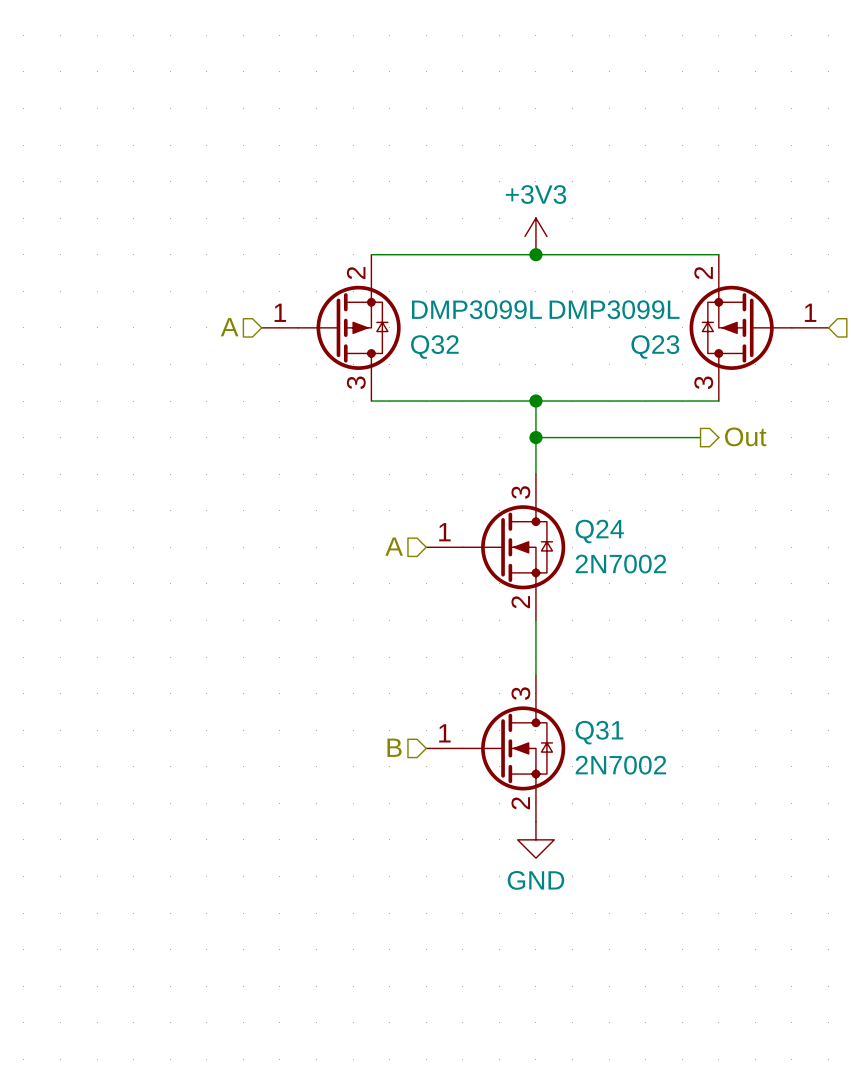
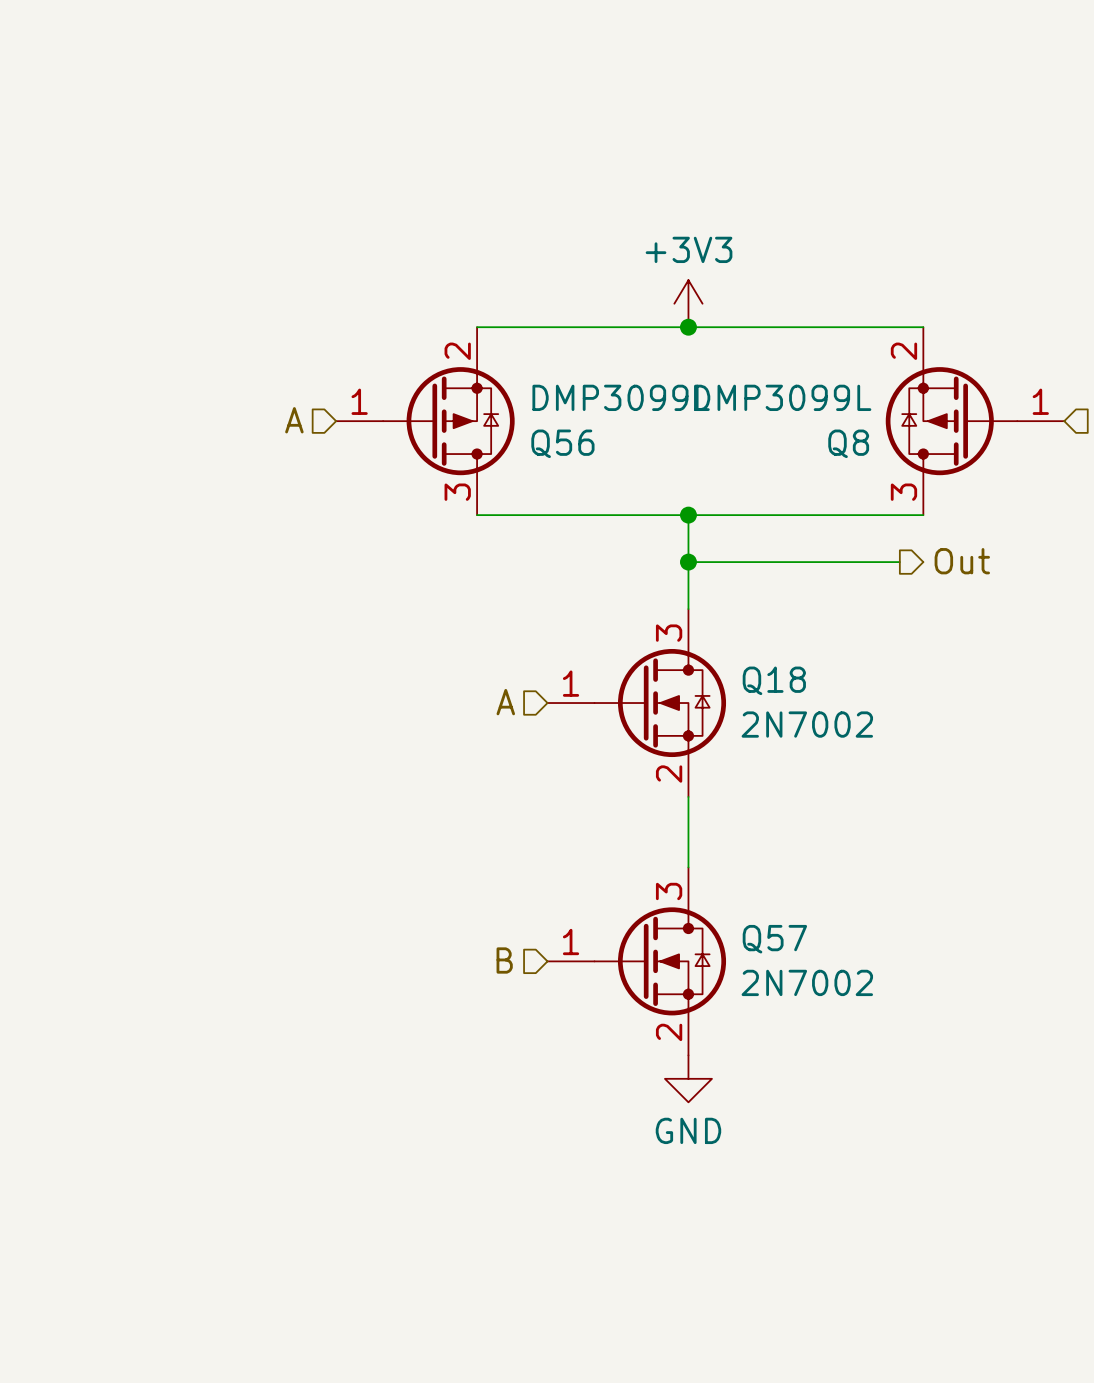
Q32 name: Q32 (434, 347) -> Q56 (562, 443)
Q23 name: Q23 (655, 347) -> Q8 (848, 443)
Q24 name: Q24 (599, 531) -> Q18 (774, 680)
Q31 name: Q31 (599, 732) -> Q57 (774, 939)

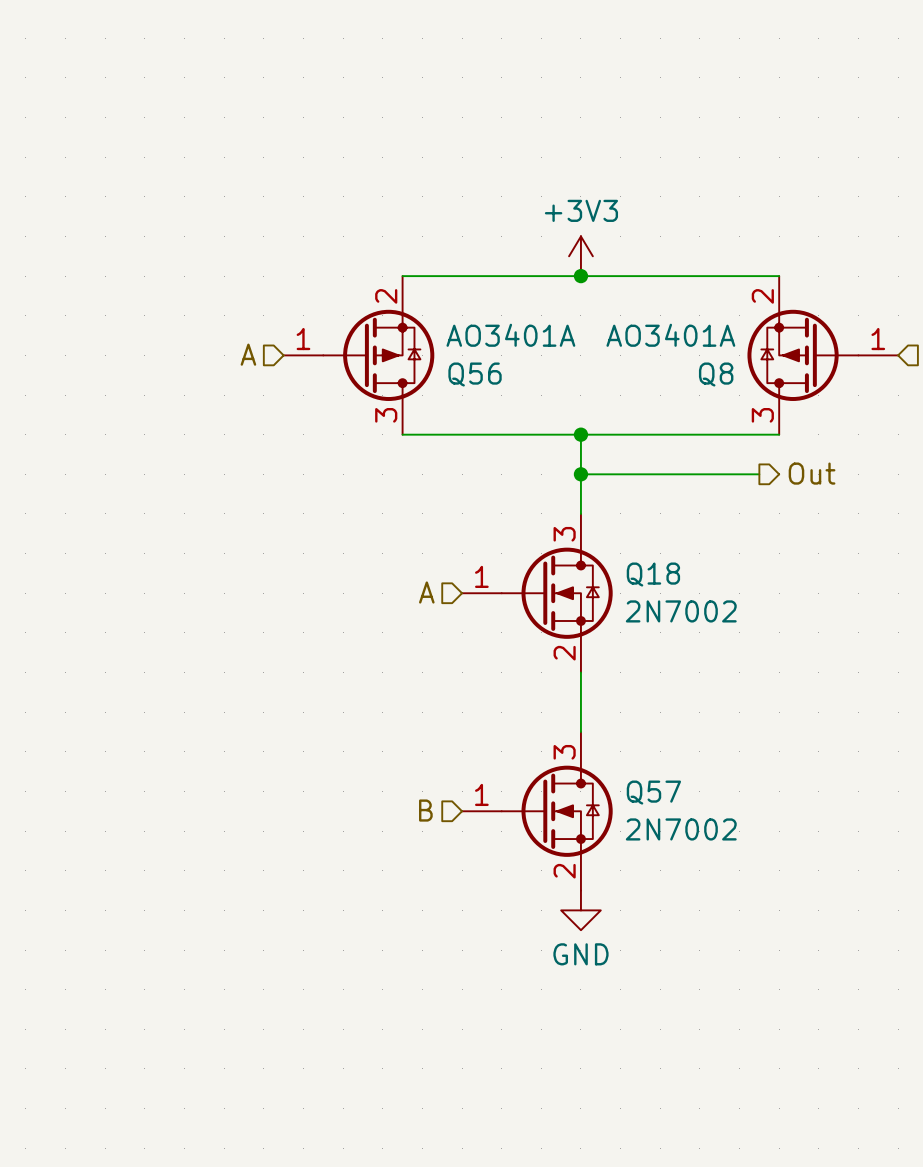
Q56 value: DMP3099L (621, 397) -> AO3401A (510, 335)
Q8 value: DMP3099L (782, 397) -> AO3401A (670, 335)

